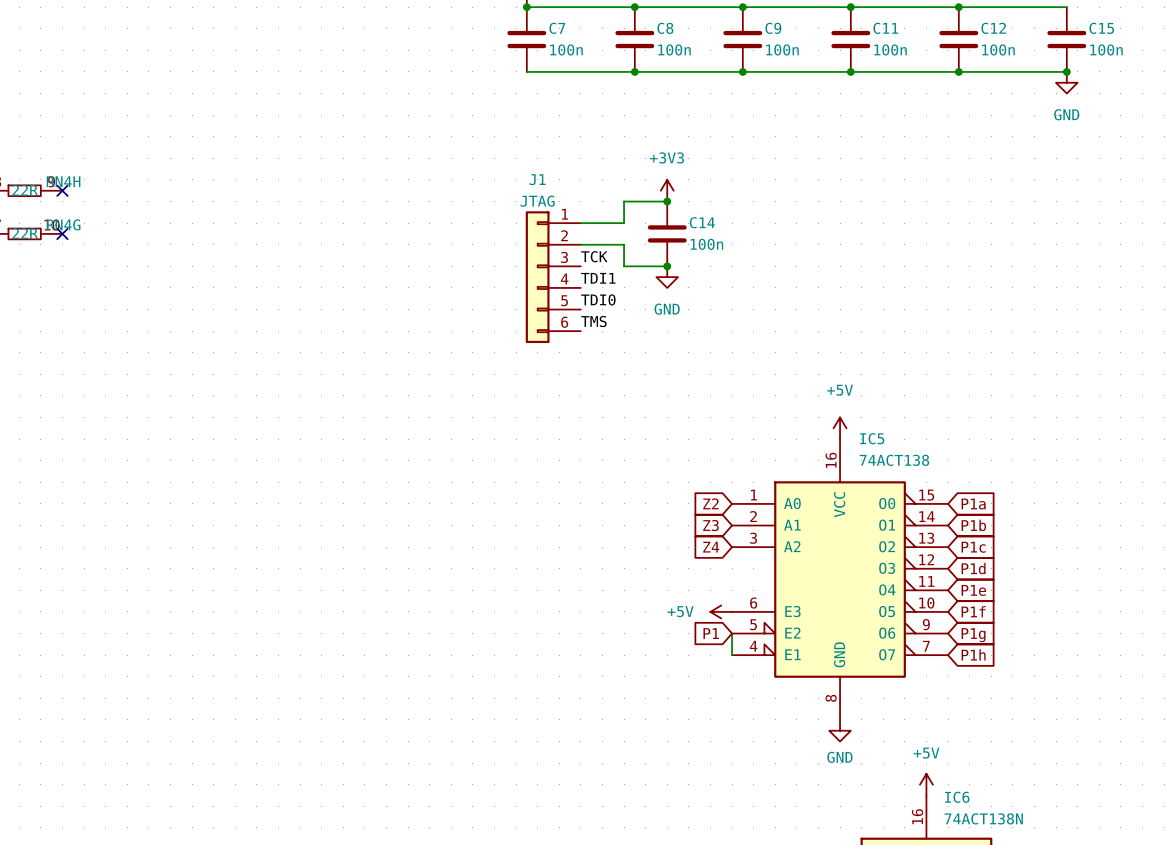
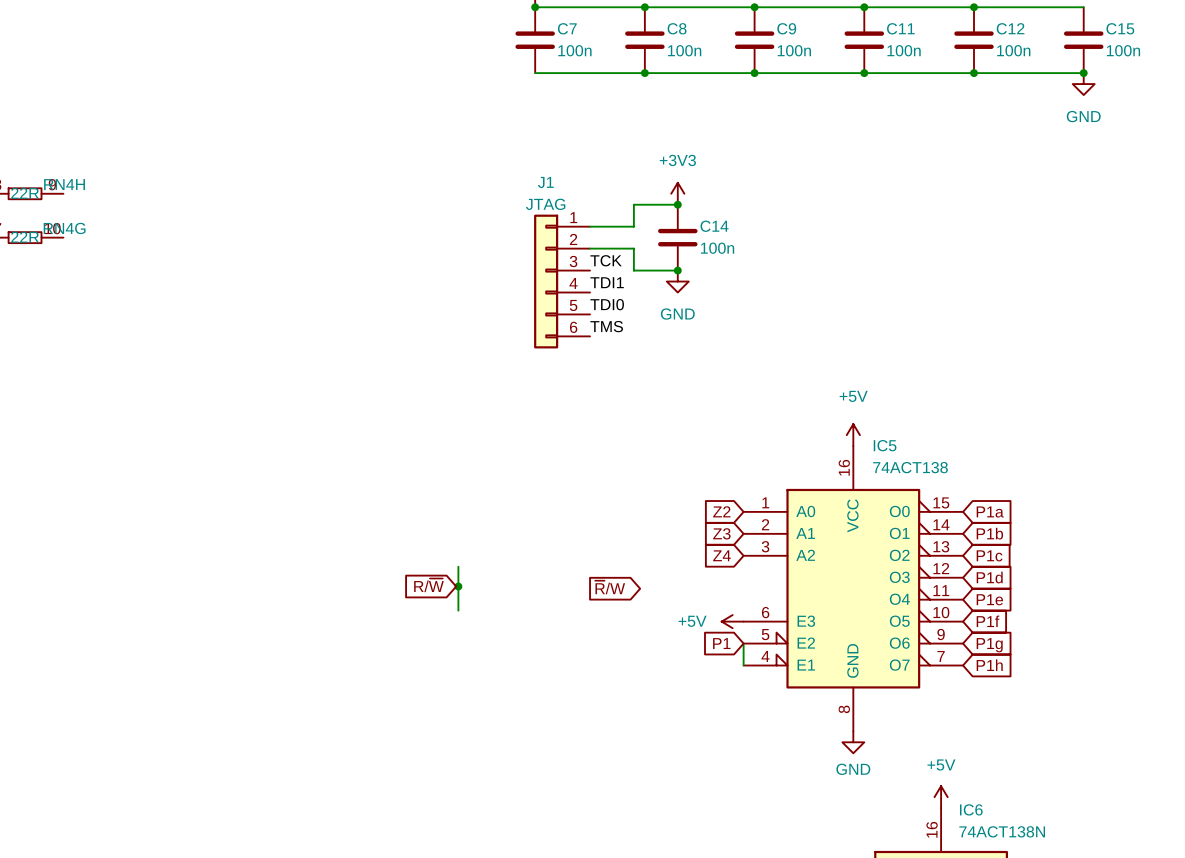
no-connect mark: (62, 190) -> none
no-connect mark: (62, 233) -> none
wire: none -> (458, 566) (458, 610)
global label: none -> R/~{W} (428, 585)
junction: none -> (458, 586)
global label: none -> ~{R}/W (610, 587)

